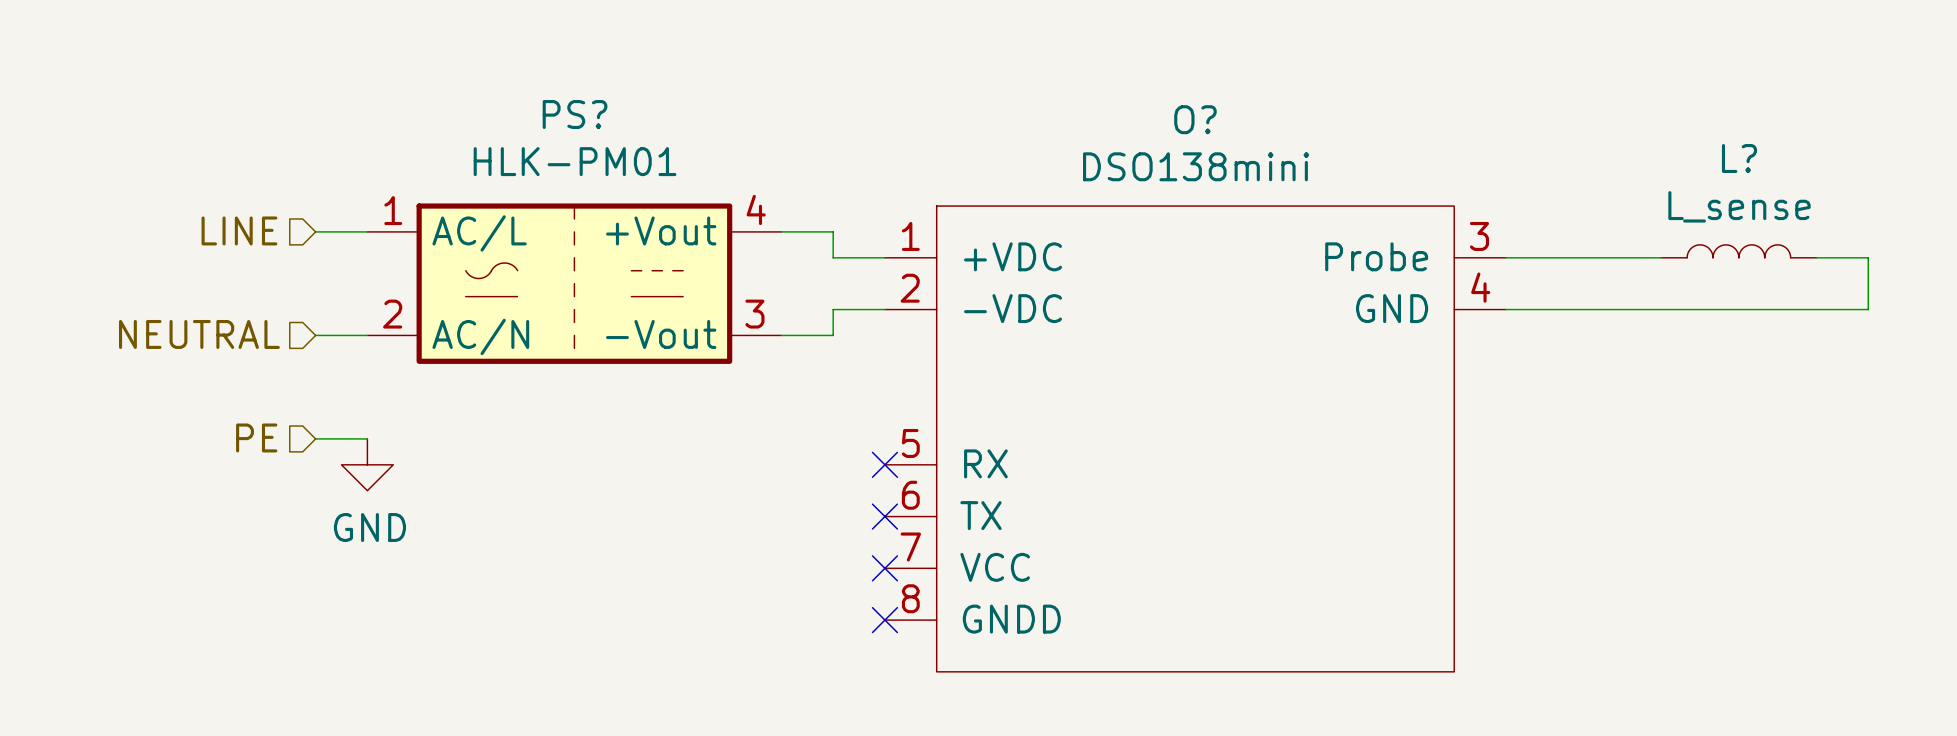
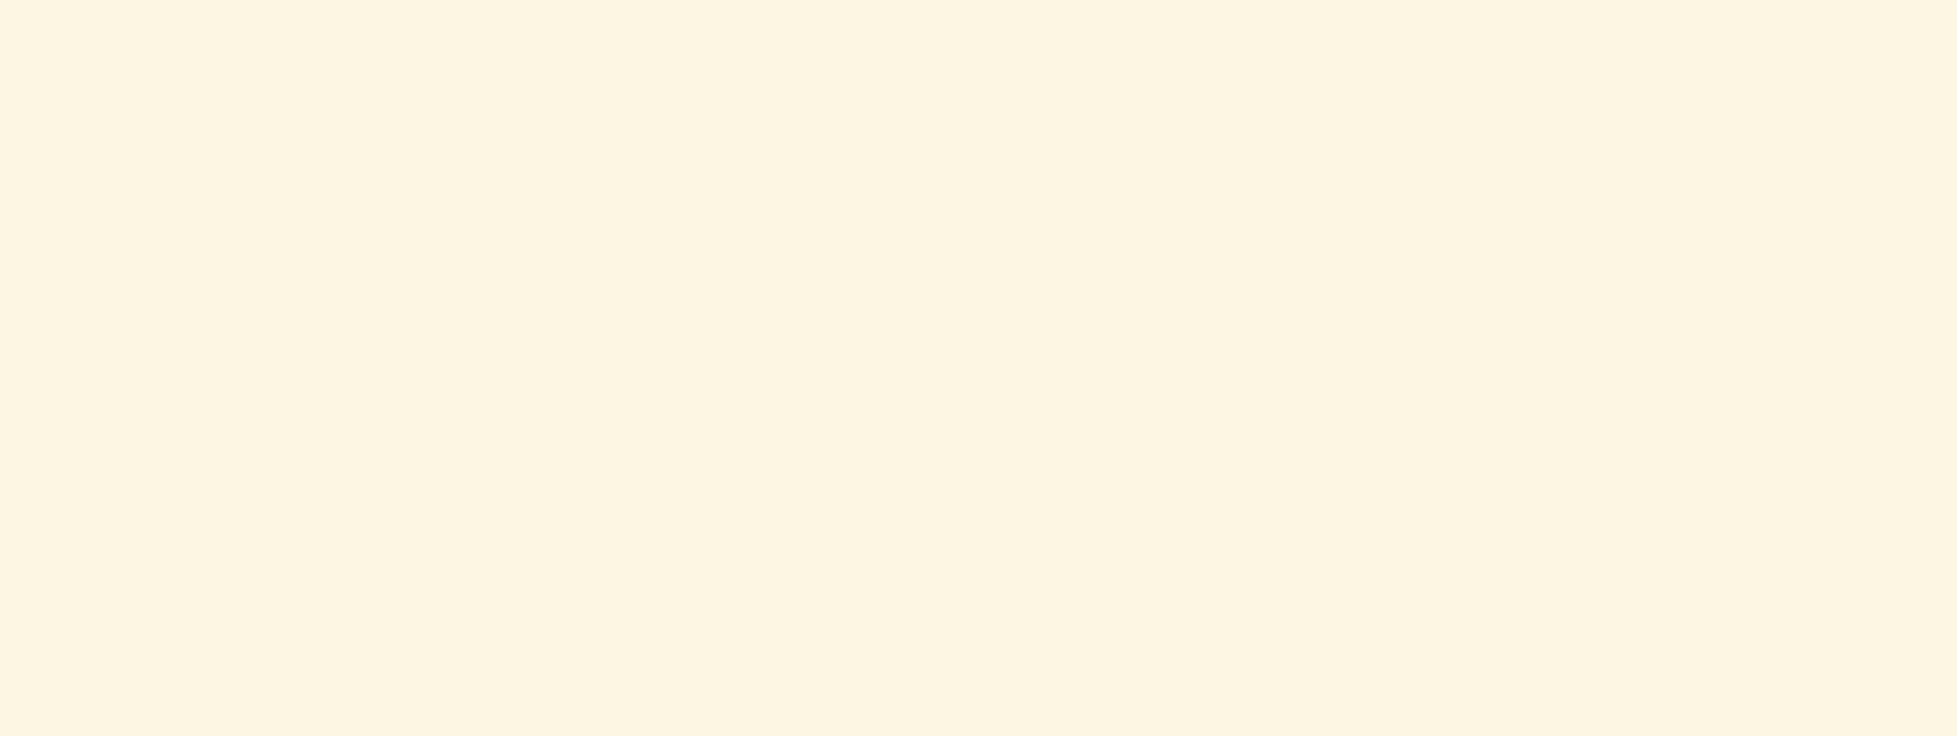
hierarchical label: LINE (239, 230) -> none
wire: (315, 231) (367, 231) -> none
wire: (781, 231) (833, 231) (833, 257) (884, 257) -> none
L?: L_sense (1738, 251) -> none
wire: (1505, 257) (1661, 257) -> none
wire: (1816, 257) (1868, 257) (1868, 309) (1505, 309) -> none
PS?: HLK-PM01 (574, 283) -> none
wire: (884, 309) (833, 309) (833, 335) (781, 335) -> none
hierarchical label: NEUTRAL (199, 334) -> none
wire: (315, 335) (367, 335) -> none
hierarchical label: PE (256, 437) -> none
wire: (315, 438) (367, 438) -> none
O?: DSO138mini (1195, 438) -> none
power symbol: GND (367, 464) -> none
no-connect mark: (884, 464) -> none
no-connect mark: (884, 516) -> none
no-connect mark: (884, 568) -> none
no-connect mark: (884, 620) -> none

